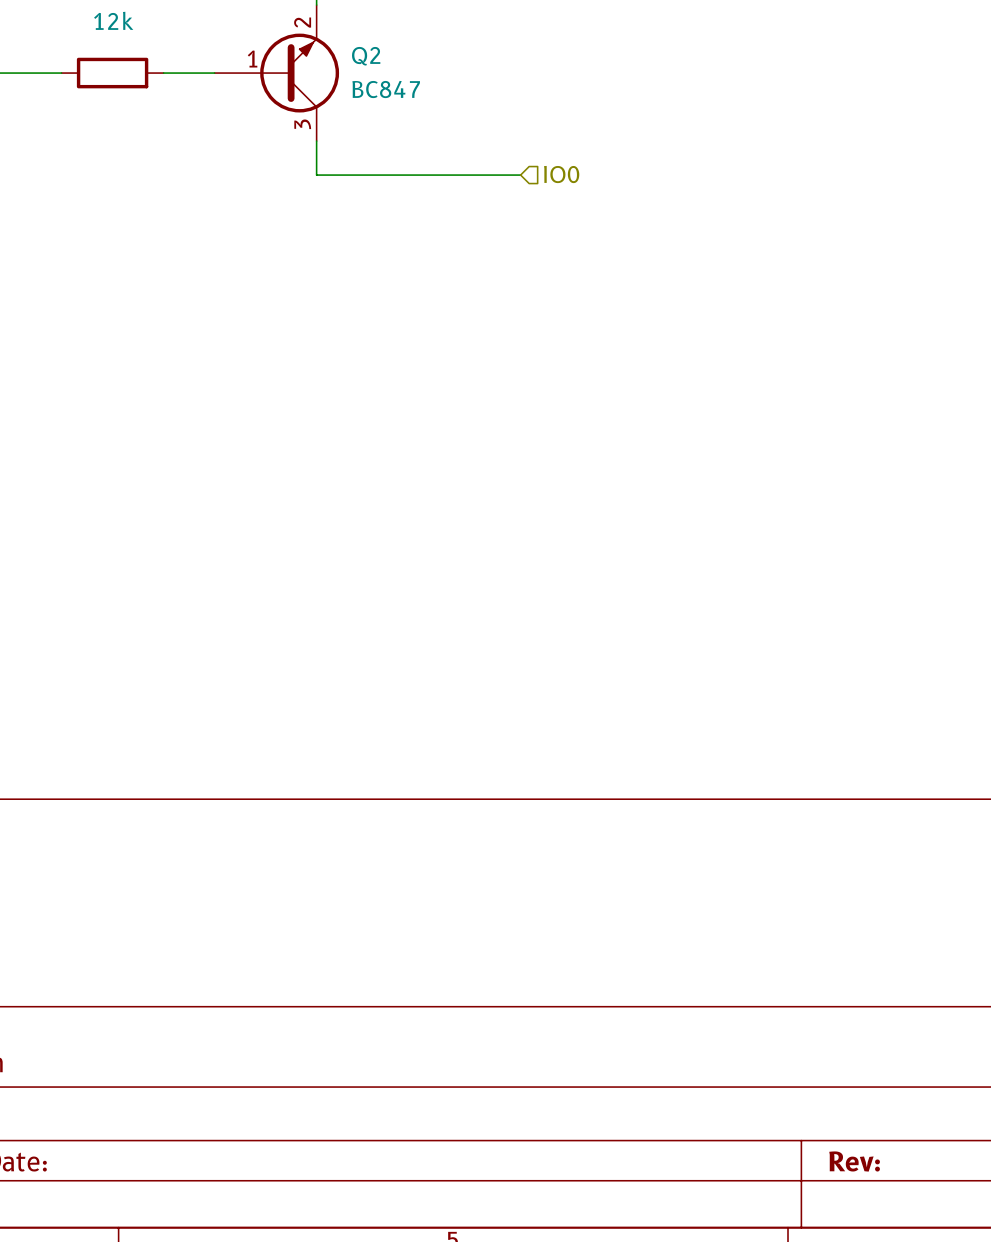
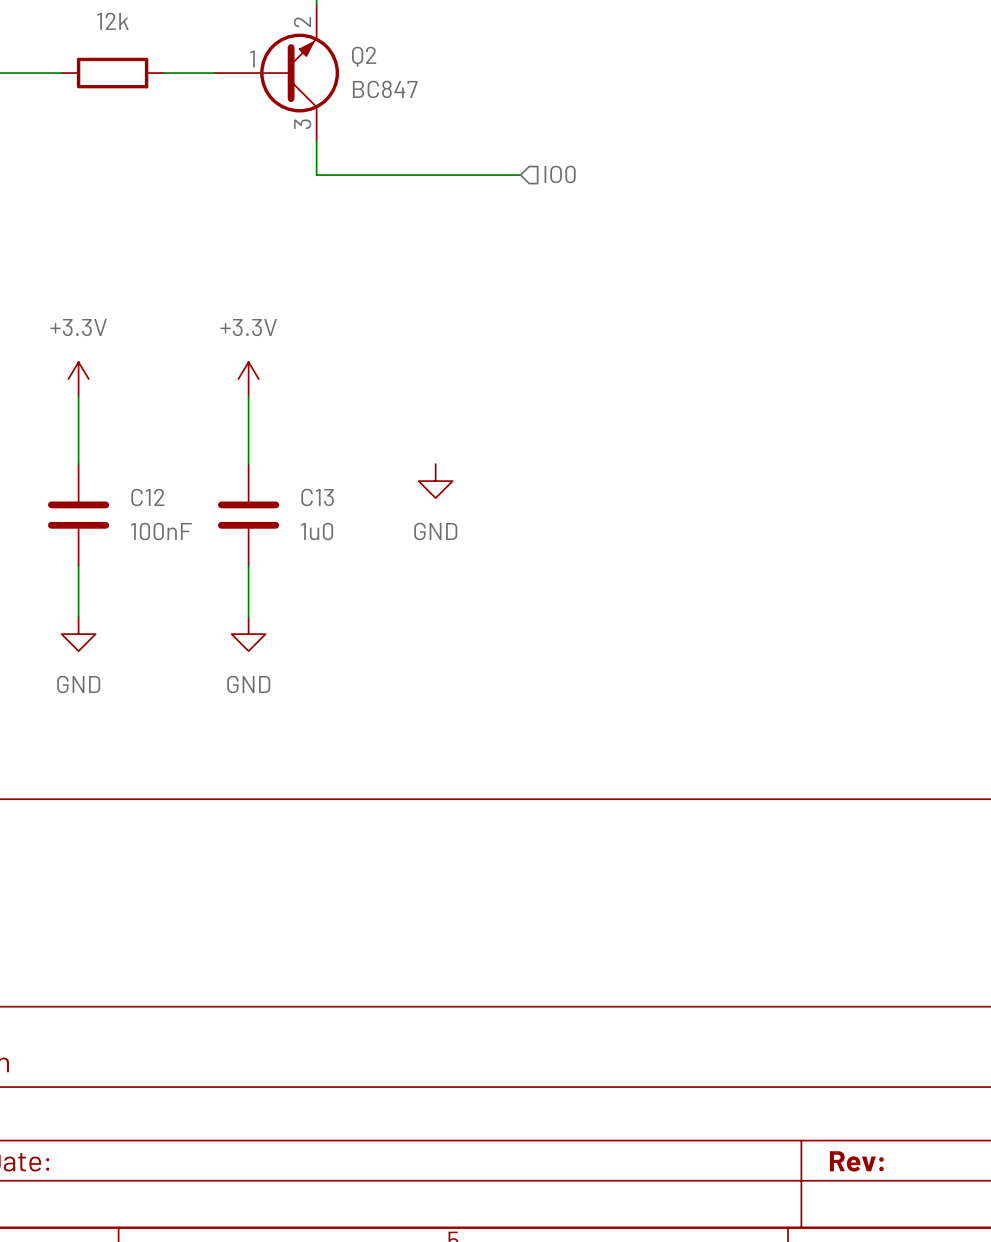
power symbol: none -> +3.3V (78, 379)
power symbol: none -> +3.3V (248, 379)
wire: none -> (78, 396) (78, 464)
wire: none -> (248, 396) (248, 464)
power symbol: none -> GND (435, 481)
C12: none -> 100nF (78, 515)
C13: none -> 1u0 (248, 515)
wire: none -> (78, 566) (78, 617)
wire: none -> (248, 566) (248, 617)
power symbol: none -> GND (78, 634)
power symbol: none -> GND (248, 634)

